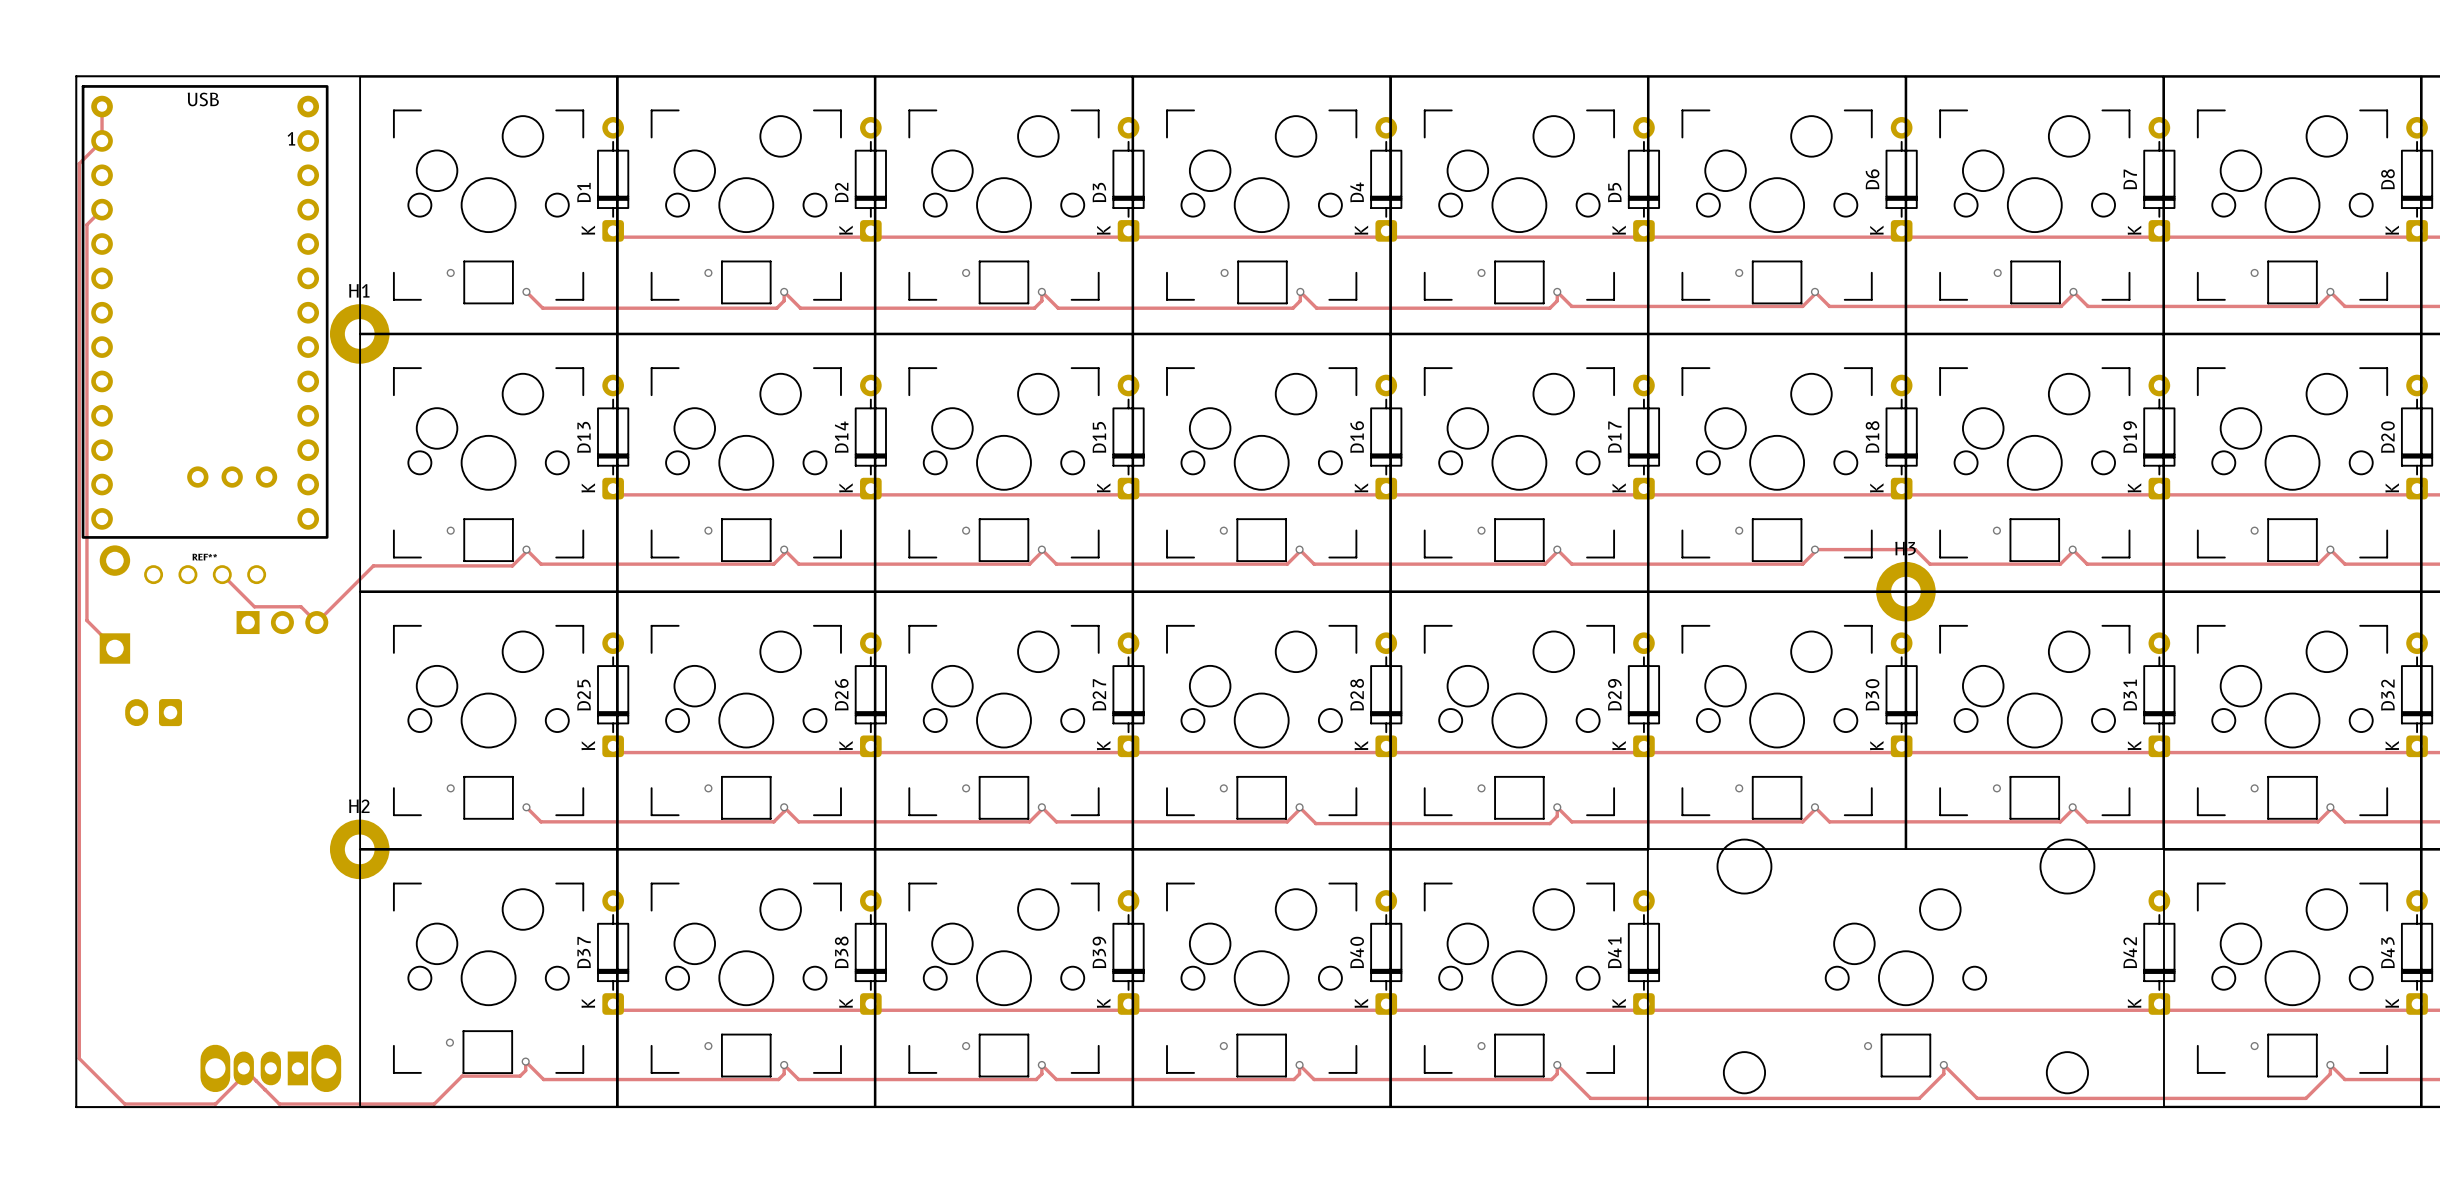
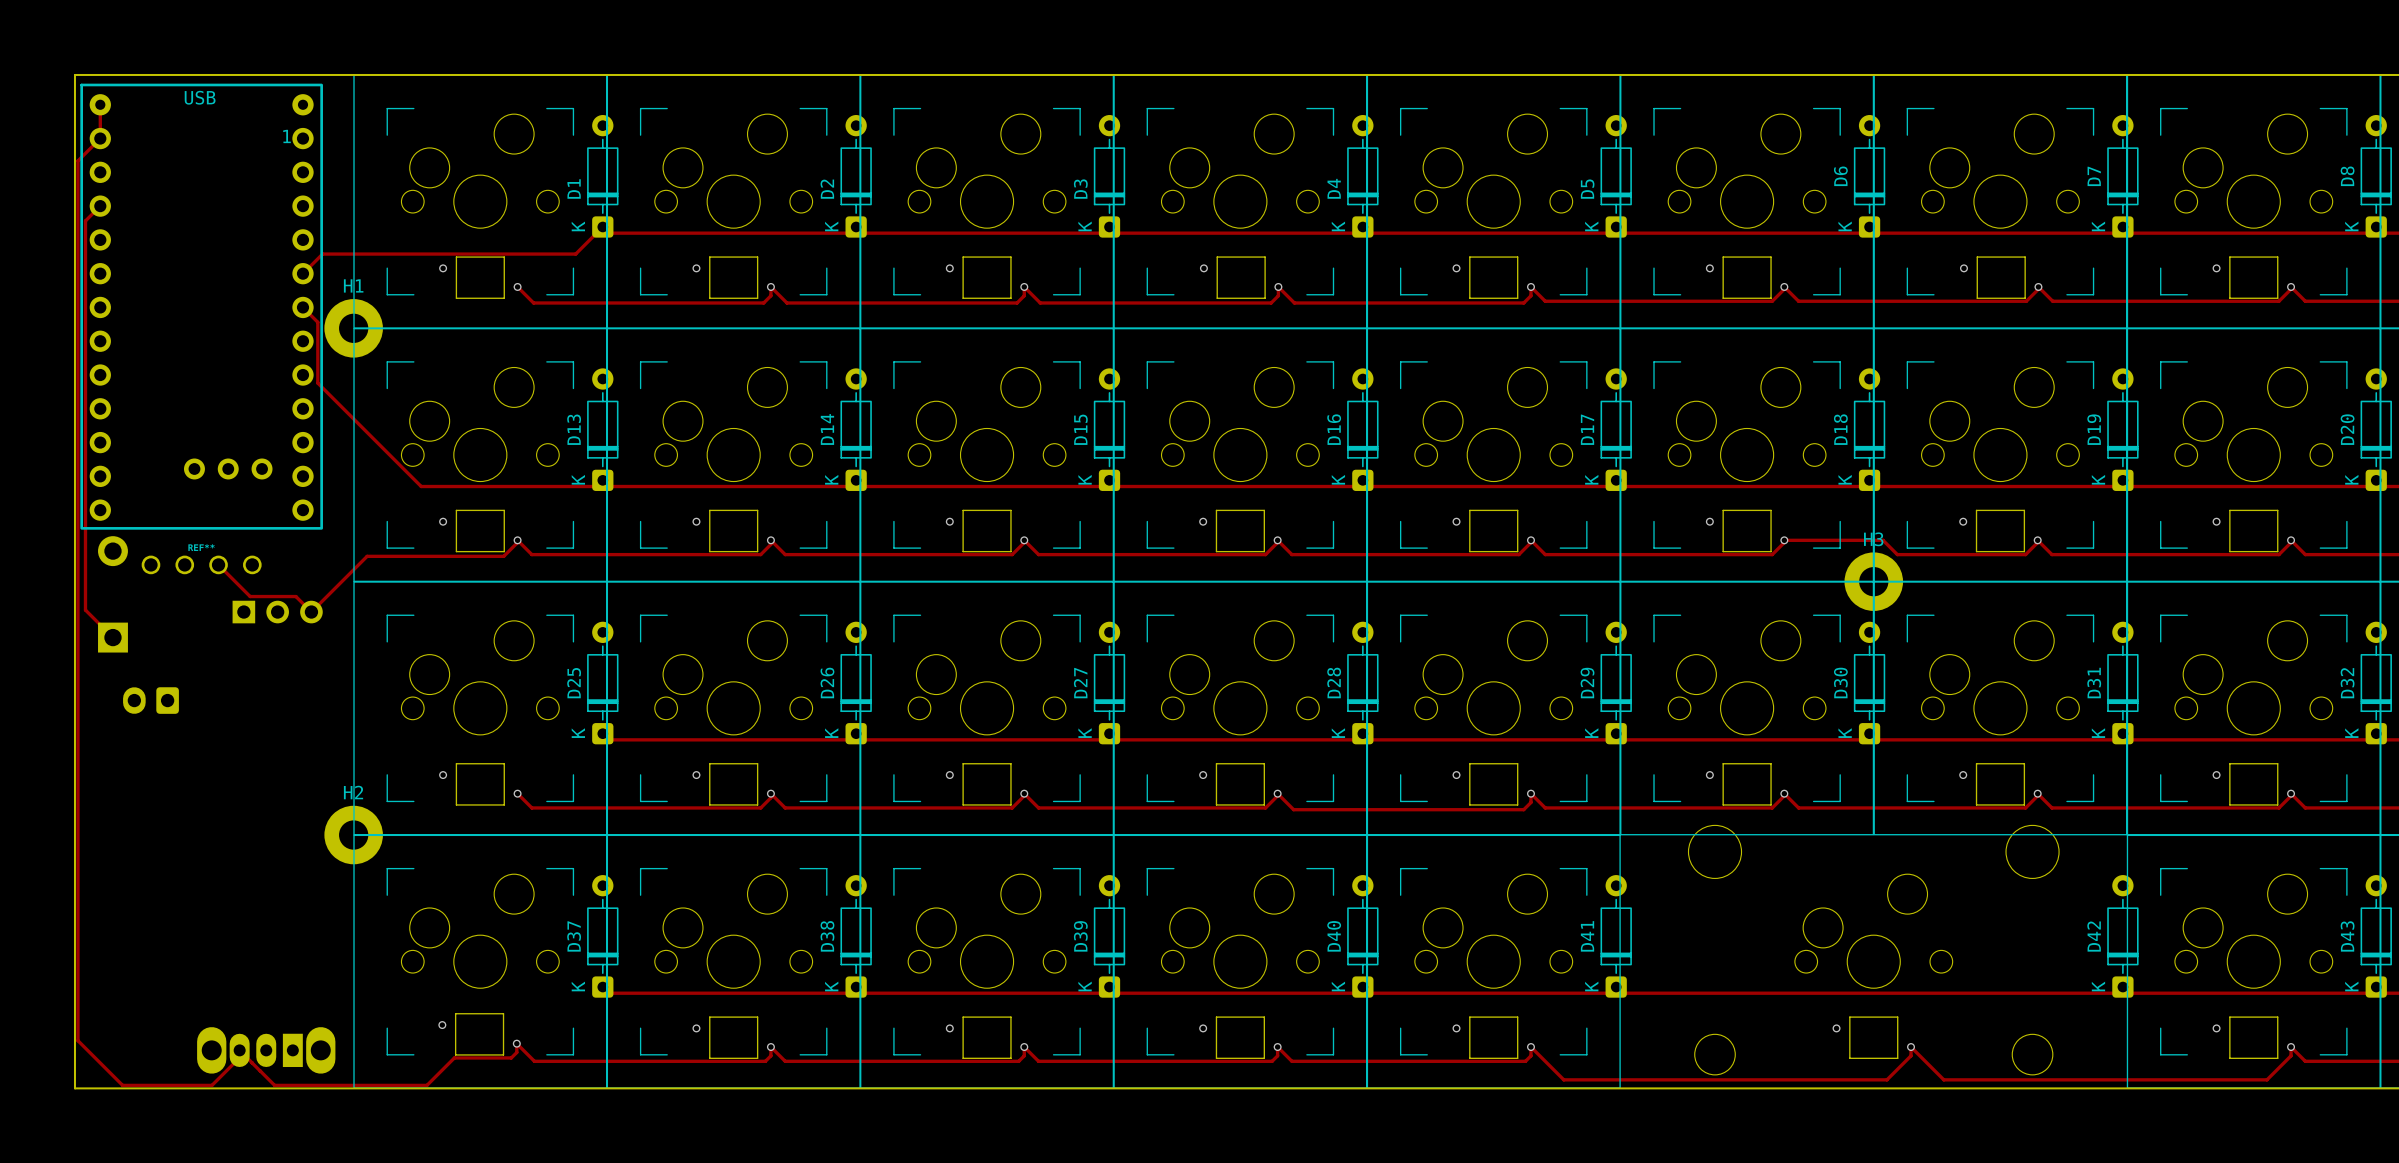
track: none -> (602, 226) (575, 254) (322, 254) (302, 273)
track: none -> (302, 307) (317, 322) (317, 383) (421, 486) (596, 486)

